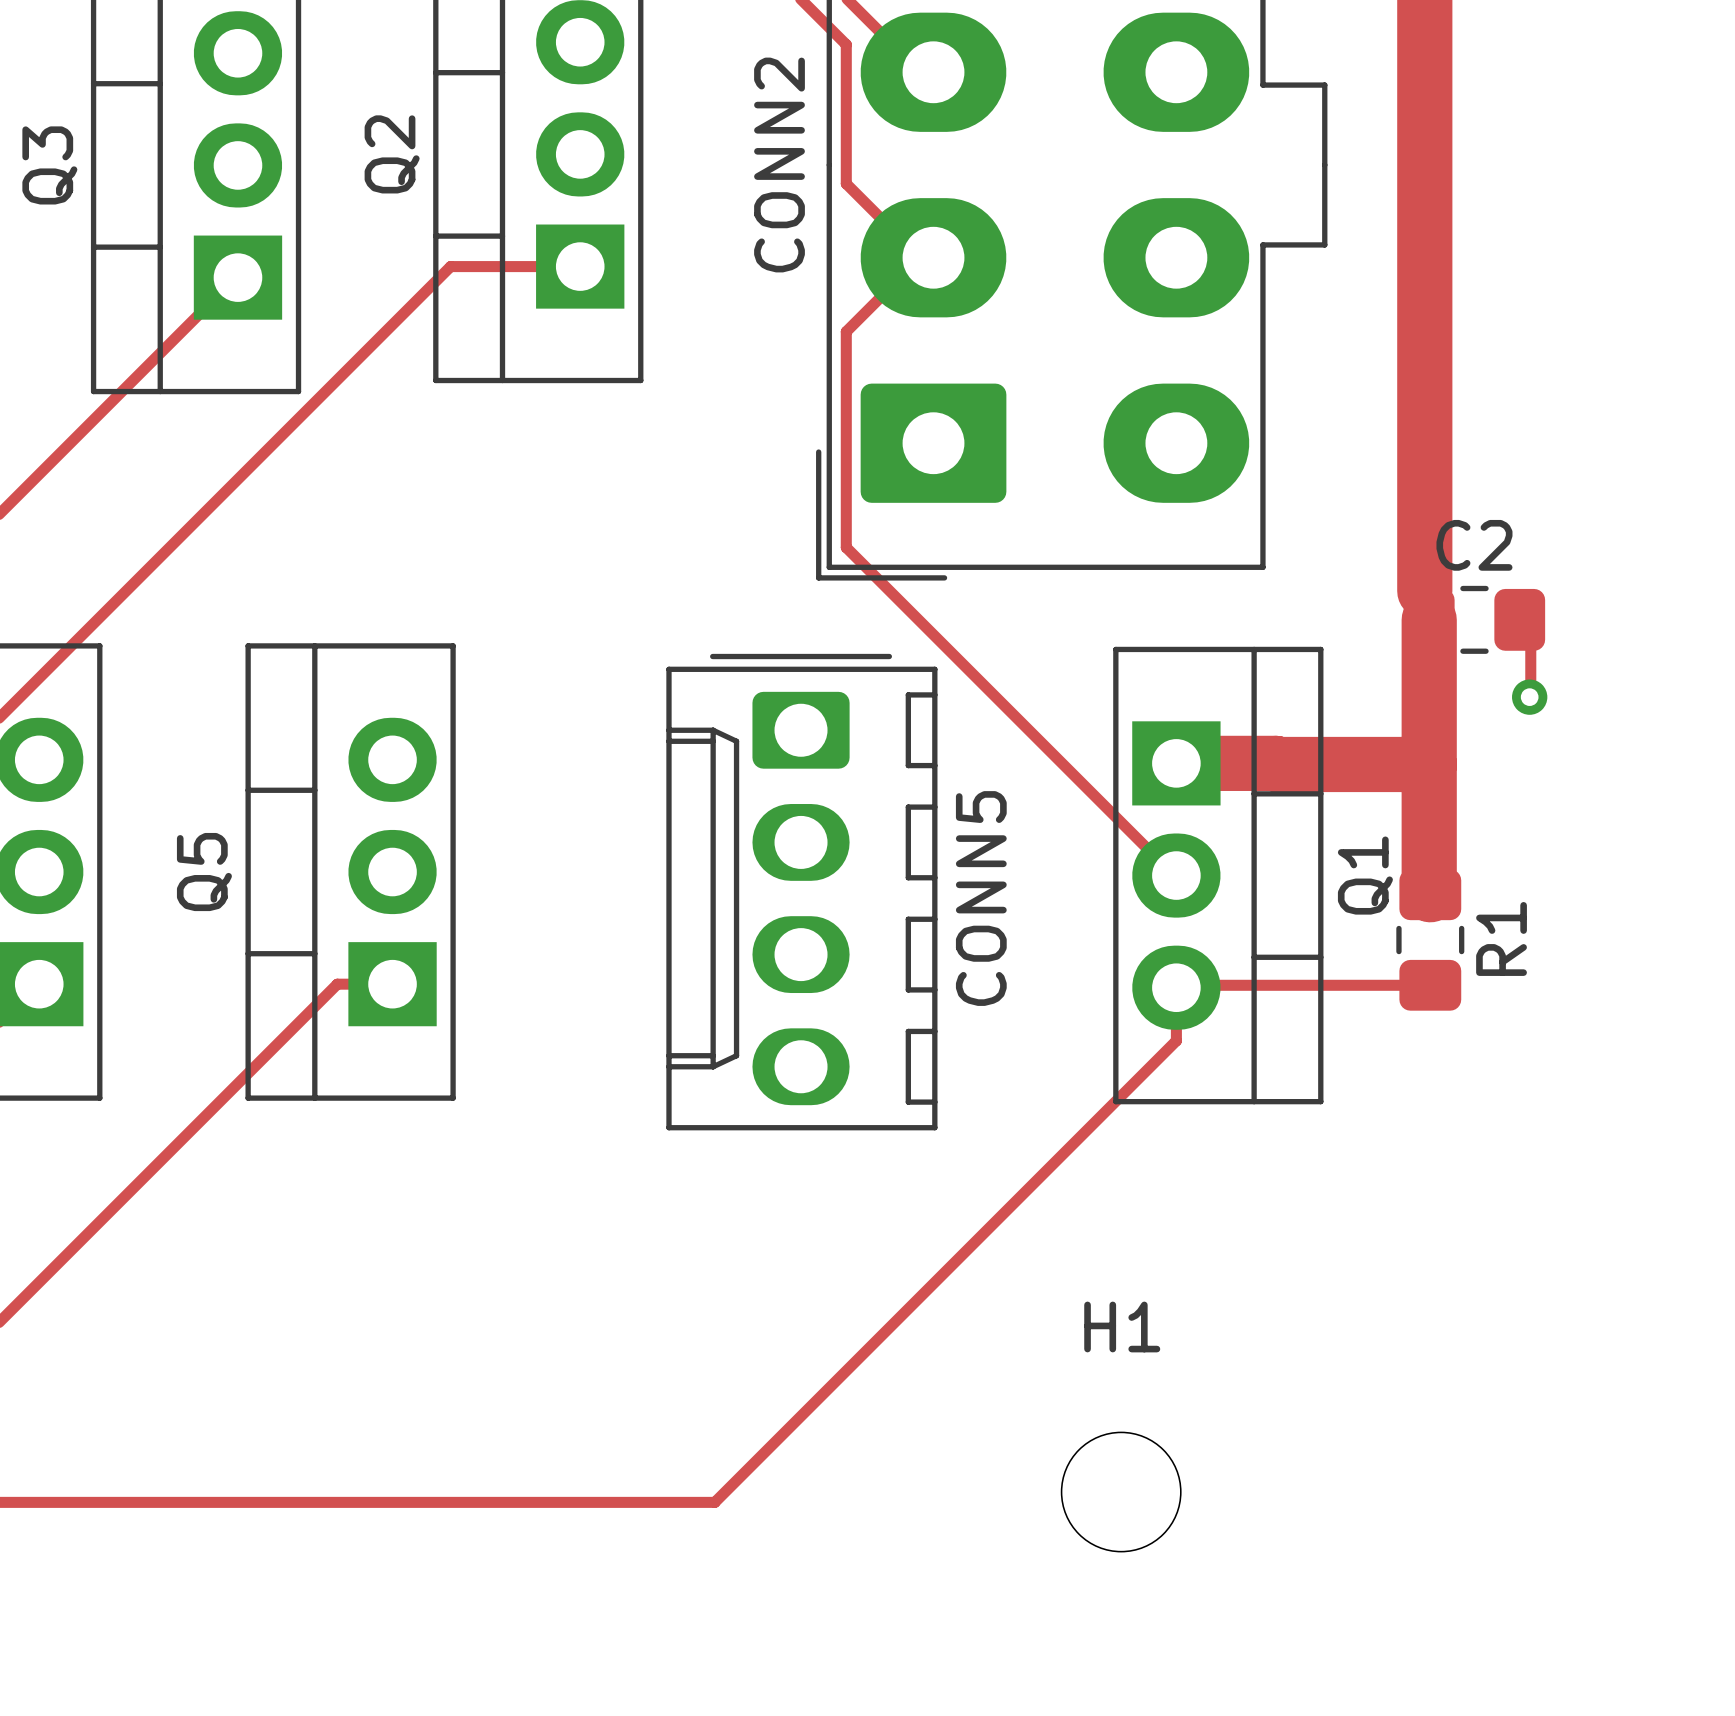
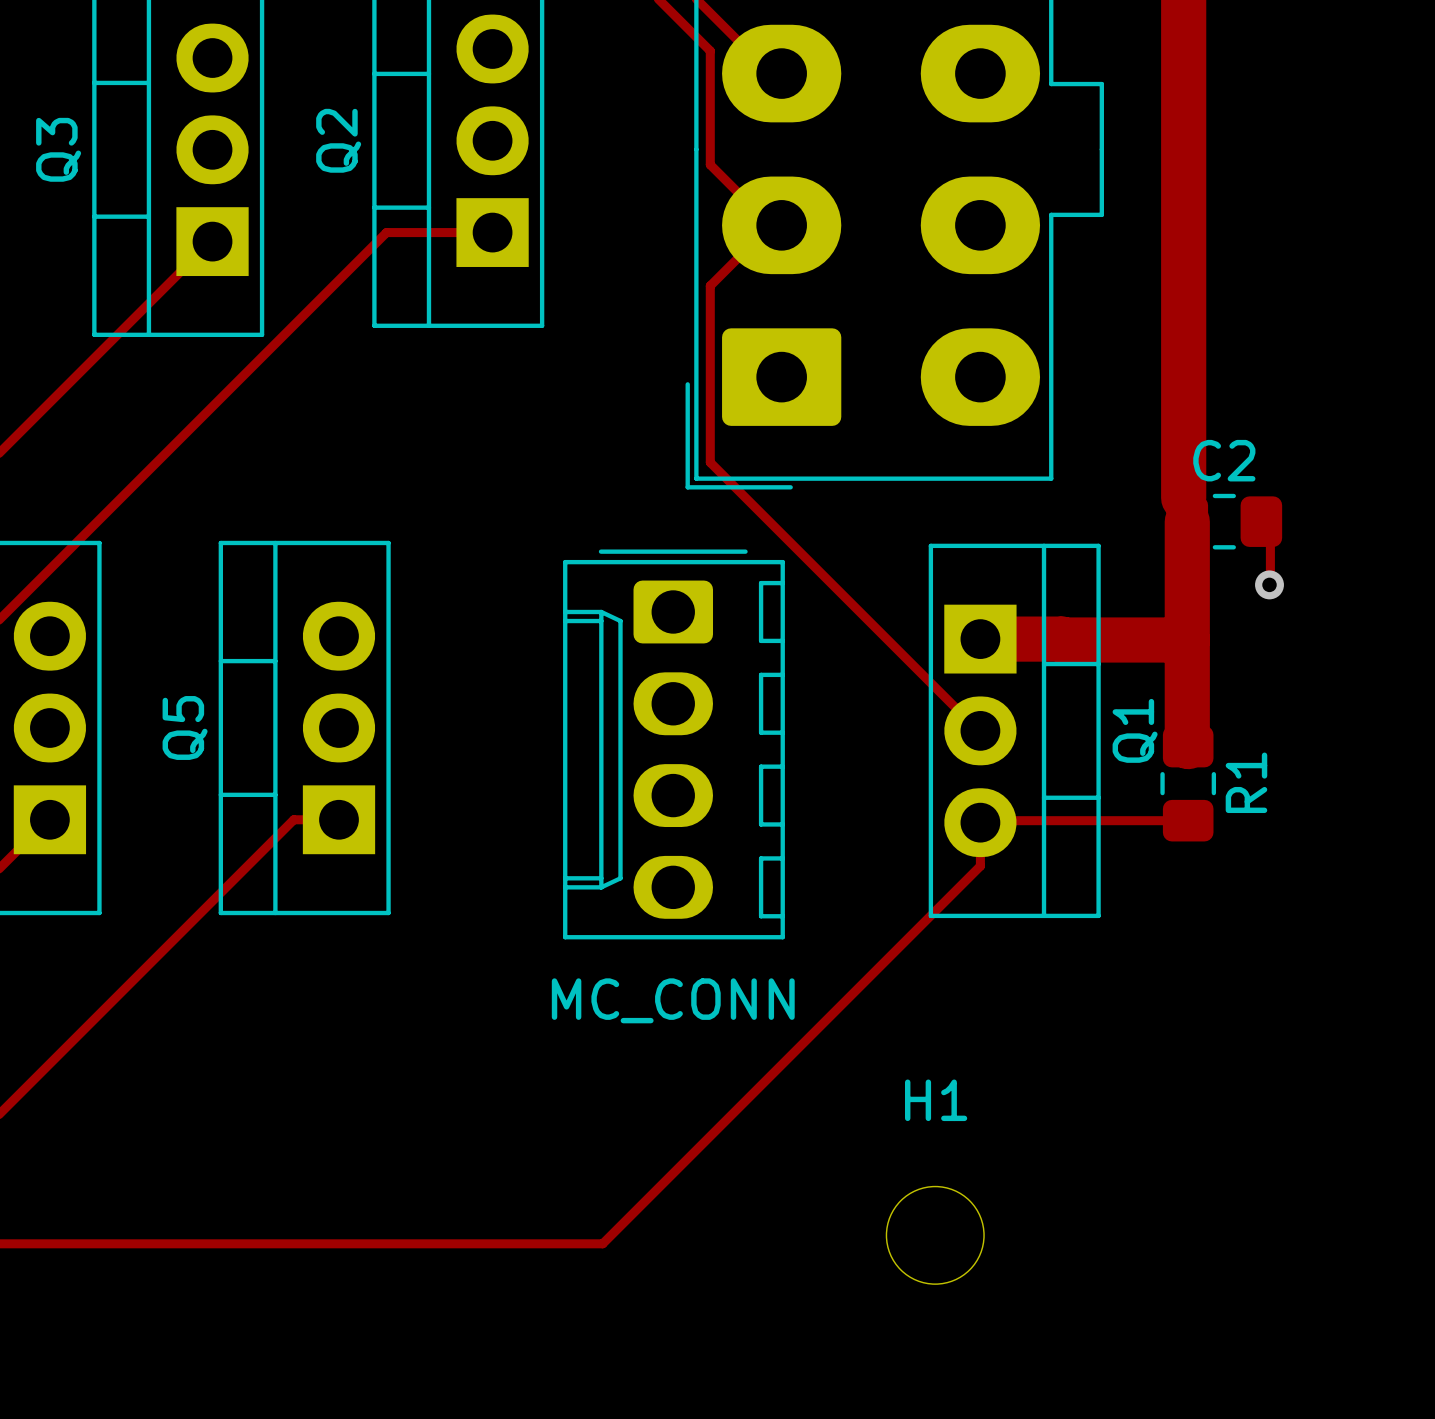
CONN2 name: CONN2 (779, 165) -> none
CONN5 name: CONN5 (981, 898) -> none
CONN5 value: none -> MC_CONN (673, 1000)

